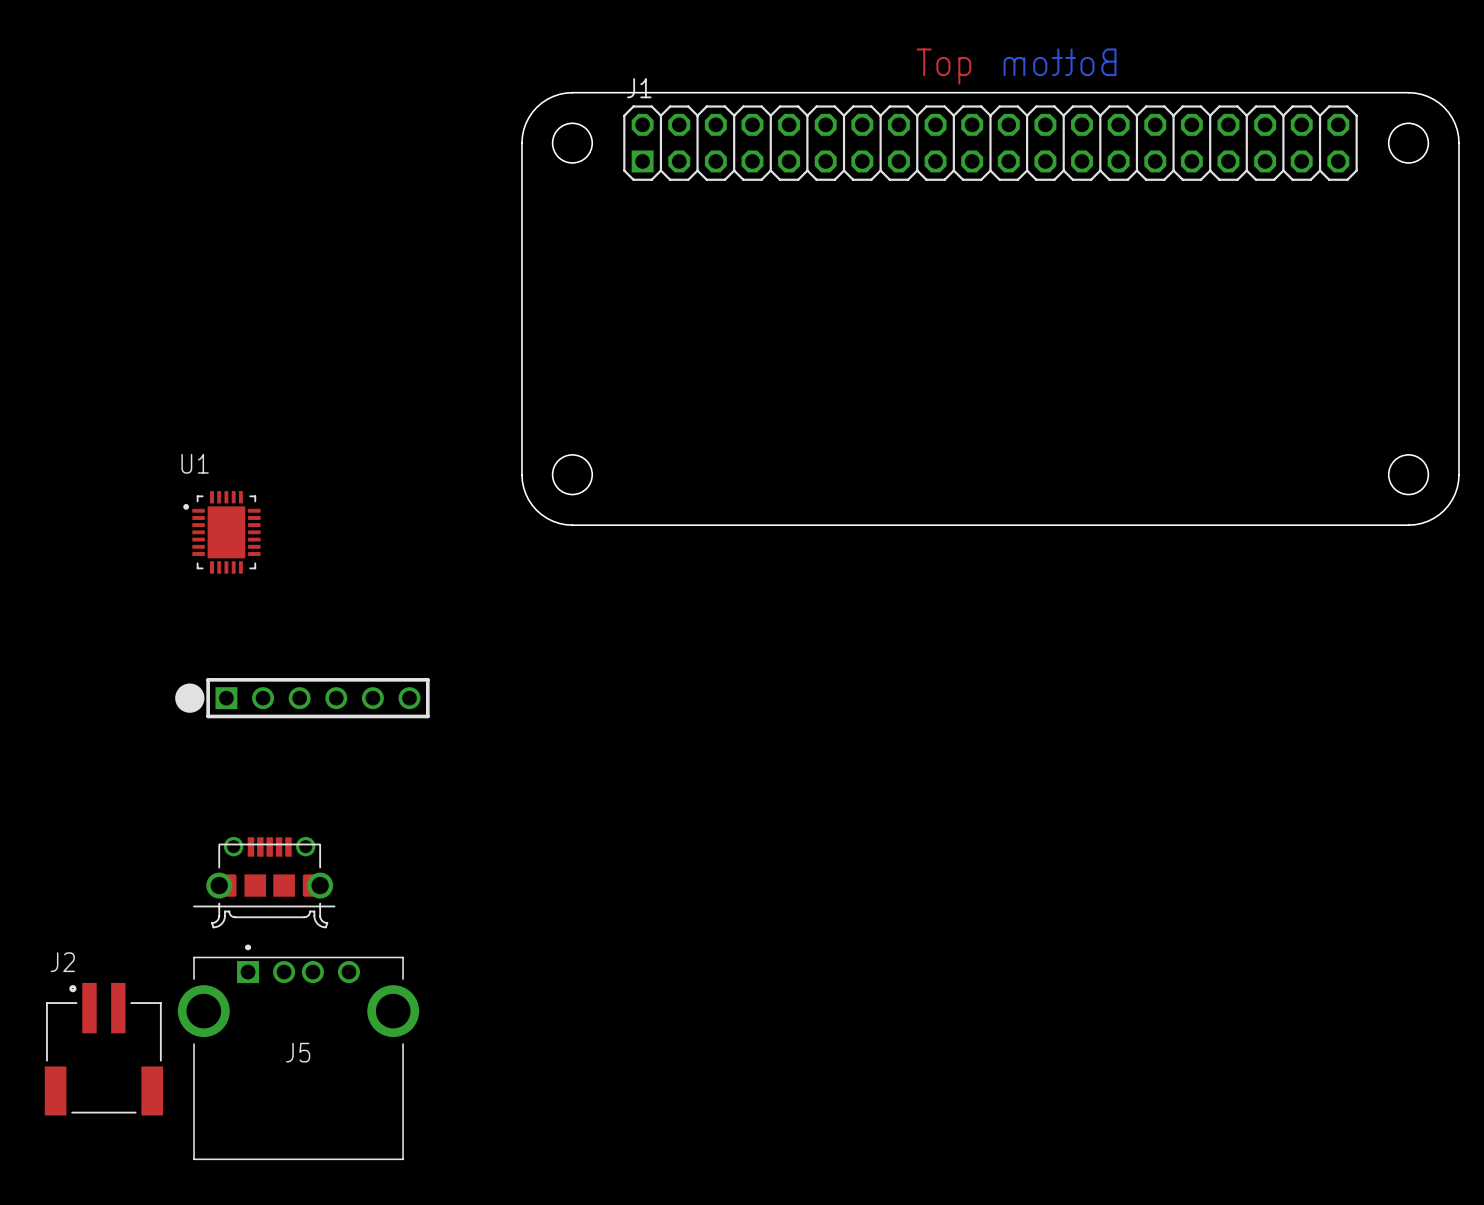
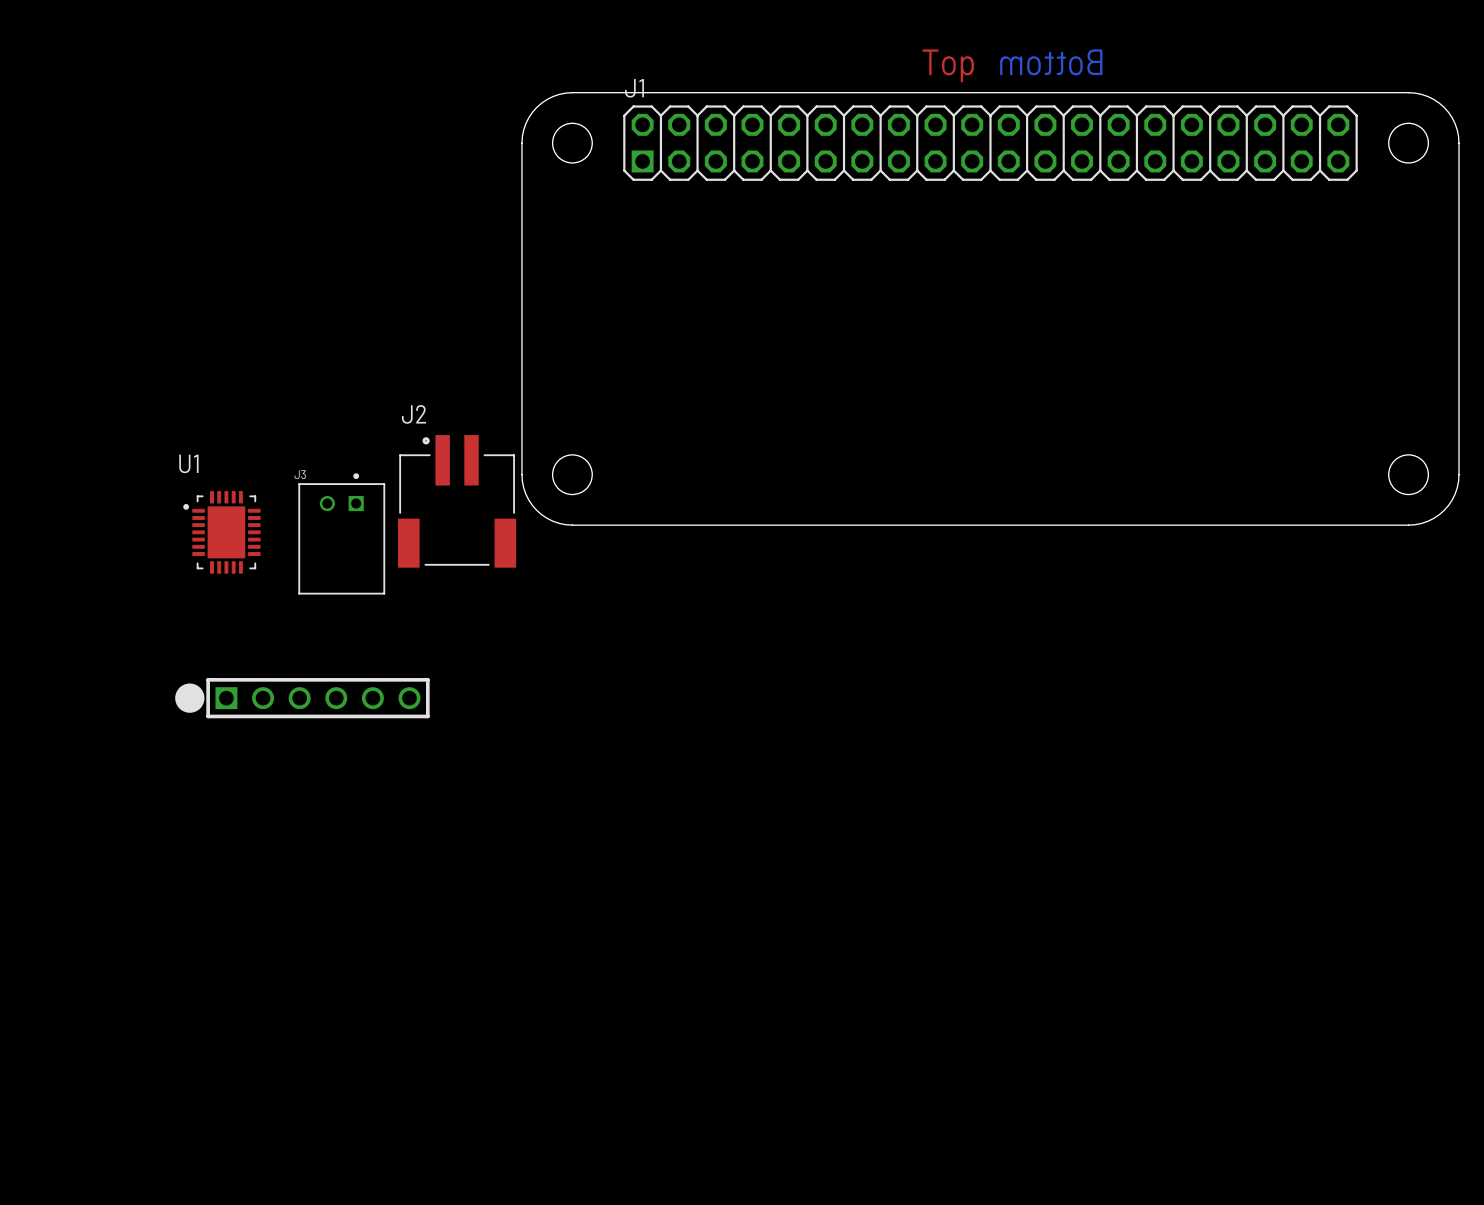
J3: none -> (341, 533)
part: (264, 882) -> none
J2 position: (103, 1049) -> (457, 501)
J5: (298, 1052) -> none

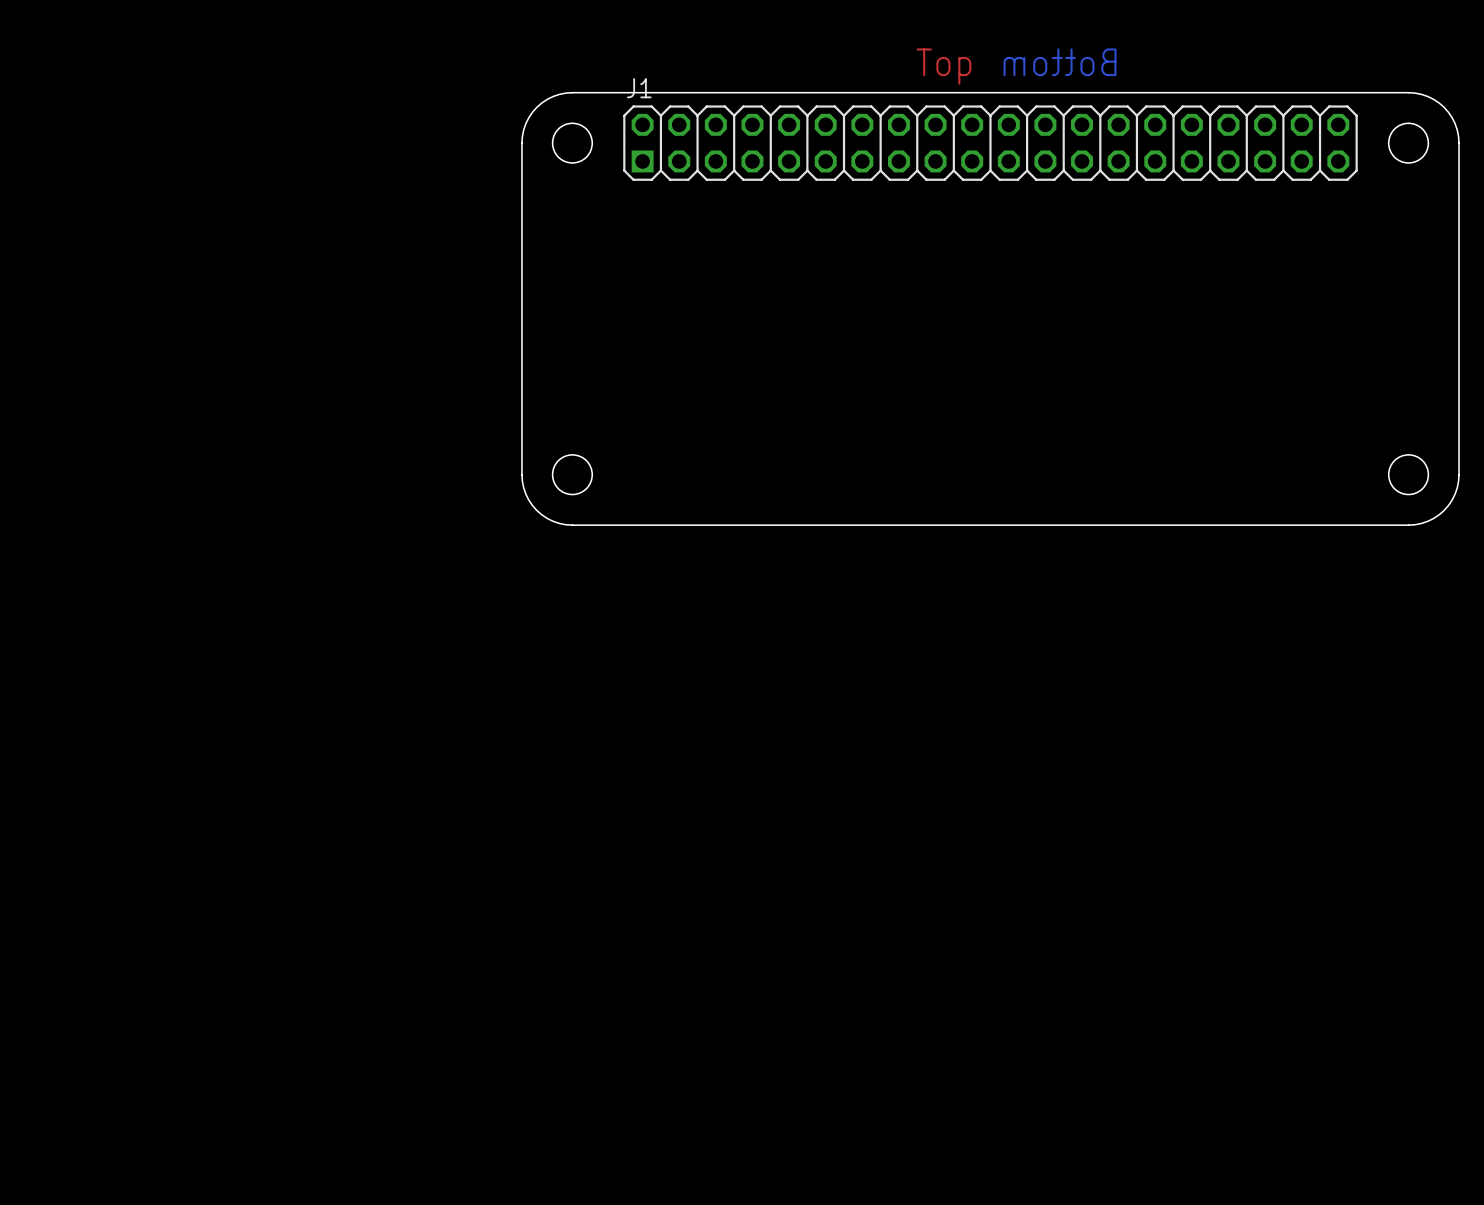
J2: (457, 501) -> none
U1: (221, 532) -> none
J3: (341, 533) -> none
part: (302, 698) -> none

